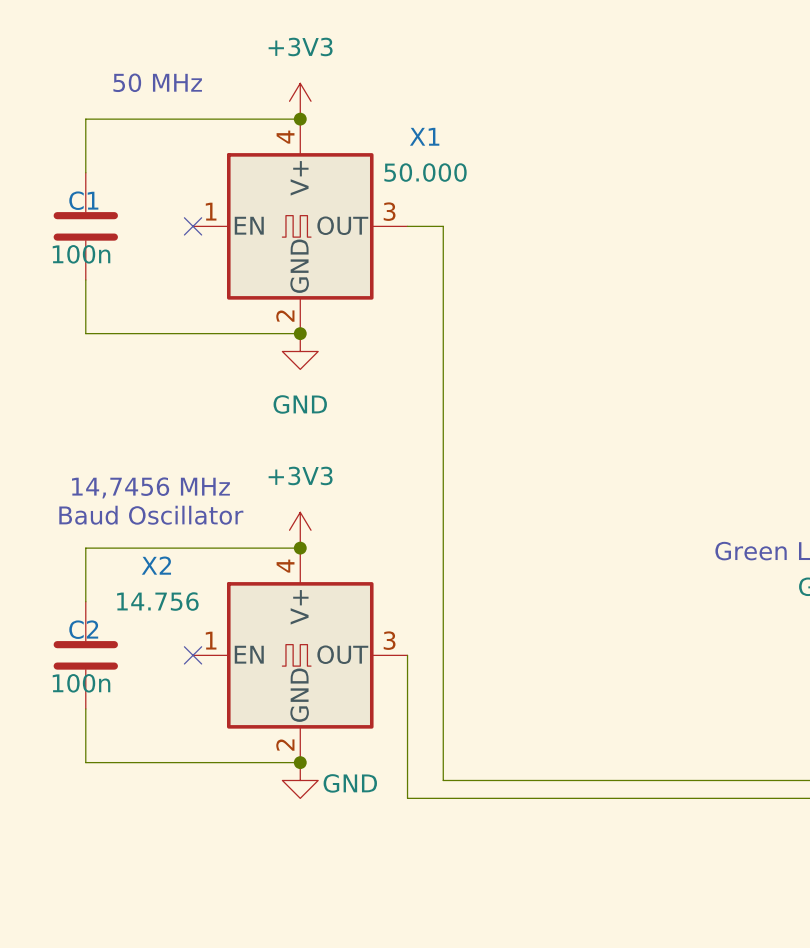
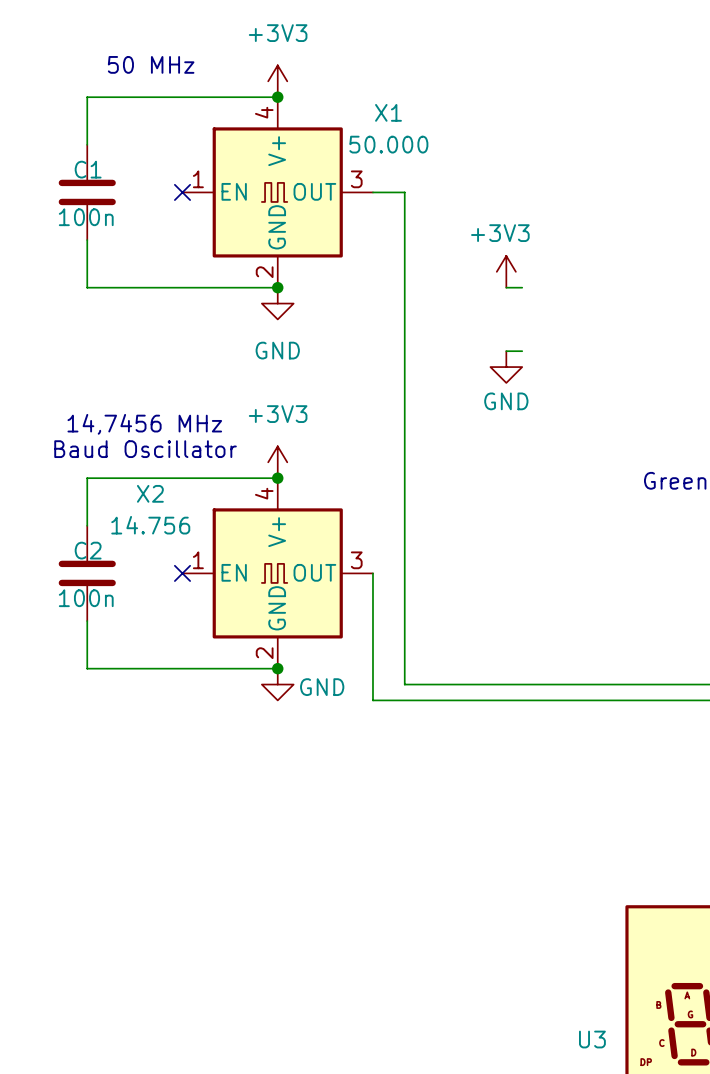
power symbol: none -> +3V3 (506, 271)
wire: none -> (506, 287) (522, 287)
wire: none -> (506, 351) (522, 351)
power symbol: none -> GND (506, 367)

